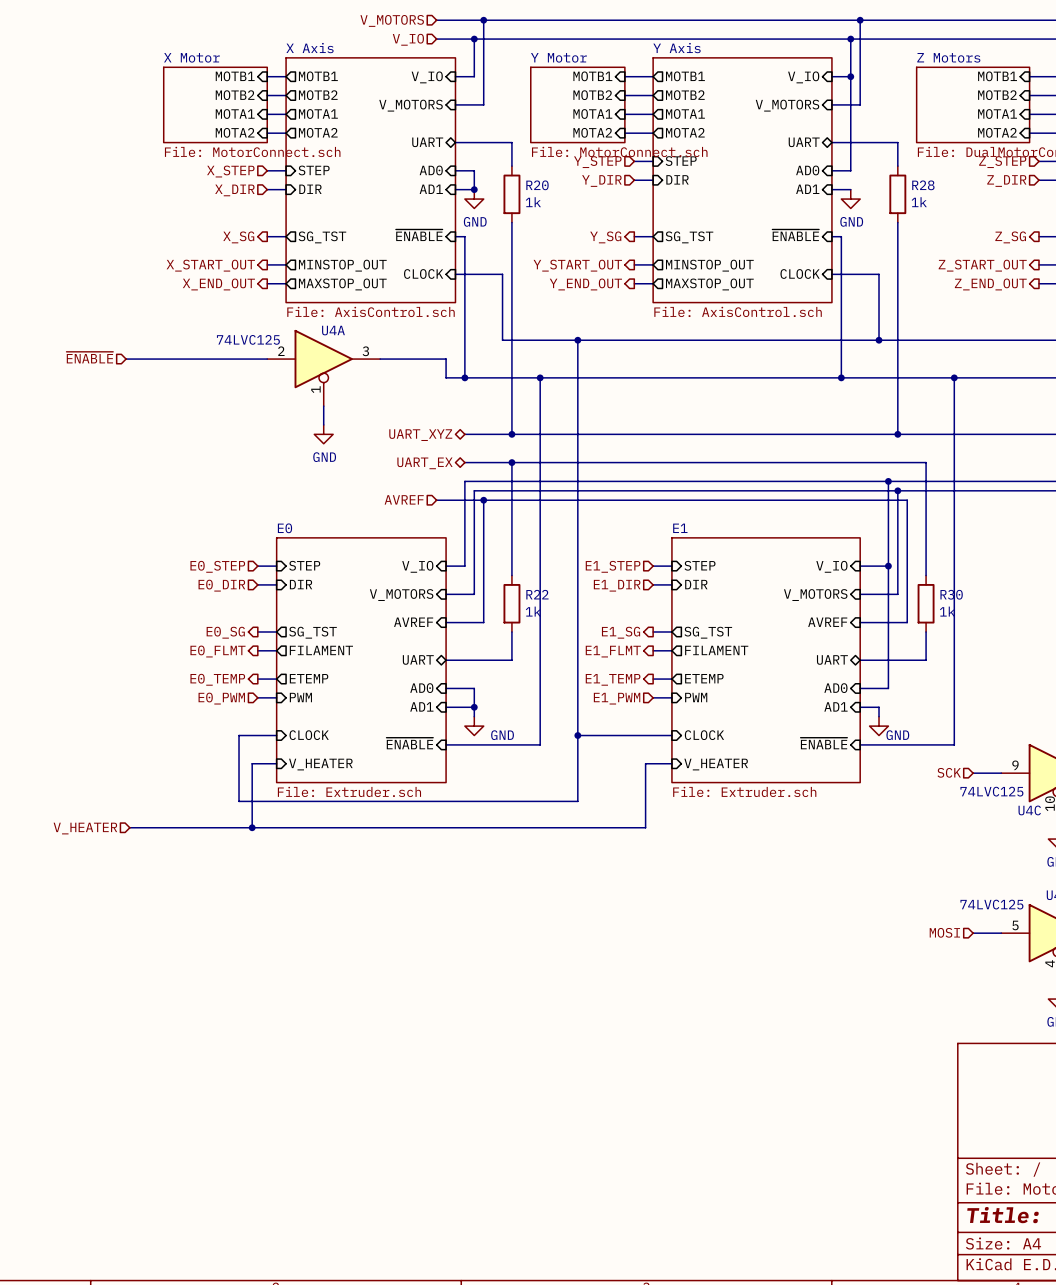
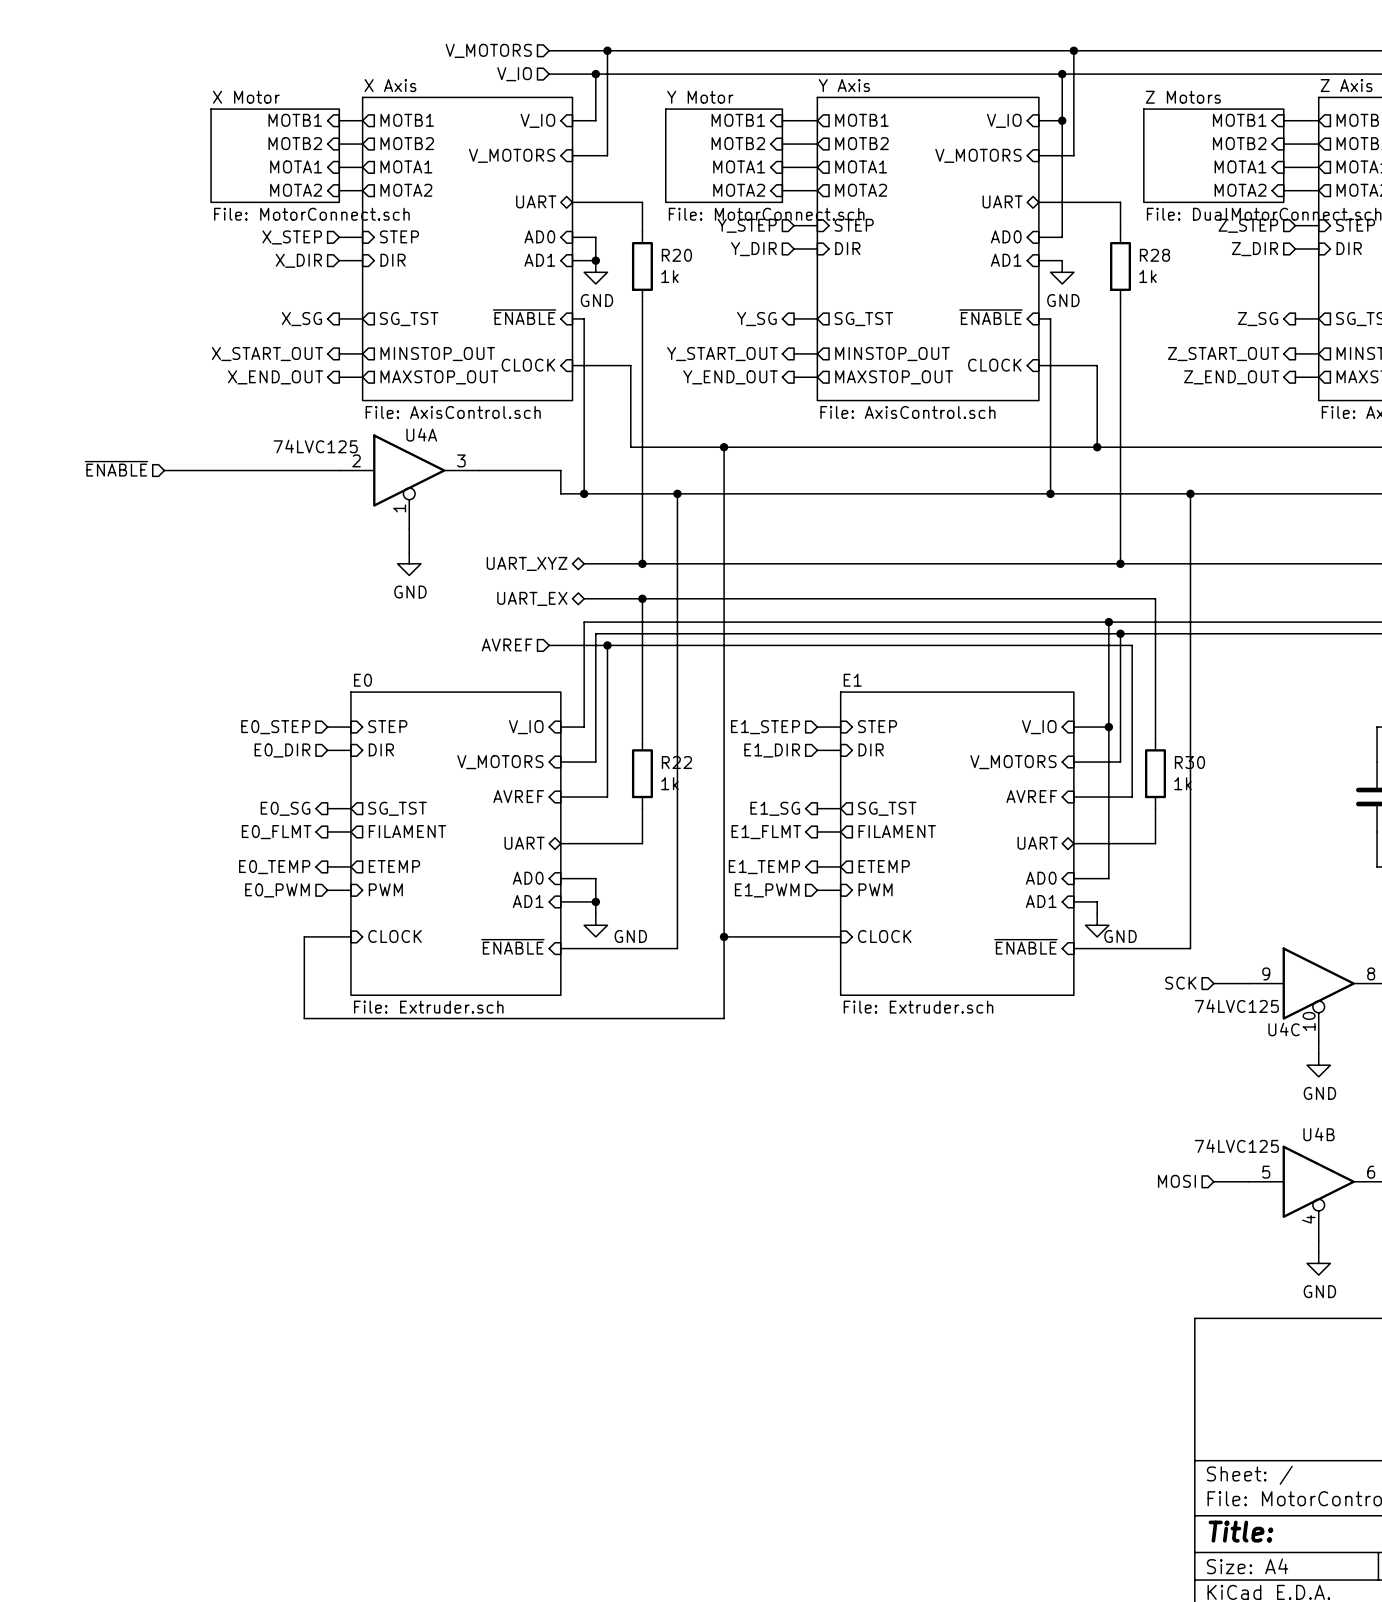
wire: (276, 763) (252, 763) (252, 827) -> none
wire: (671, 763) (645, 763) (645, 827) (129, 827) -> none
sheet pin: V_HEATER (320, 764) -> none
sheet pin: V_HEATER (716, 764) -> none
junction: (252, 827) -> none
hierarchical label: V_HEATER (85, 828) -> none

